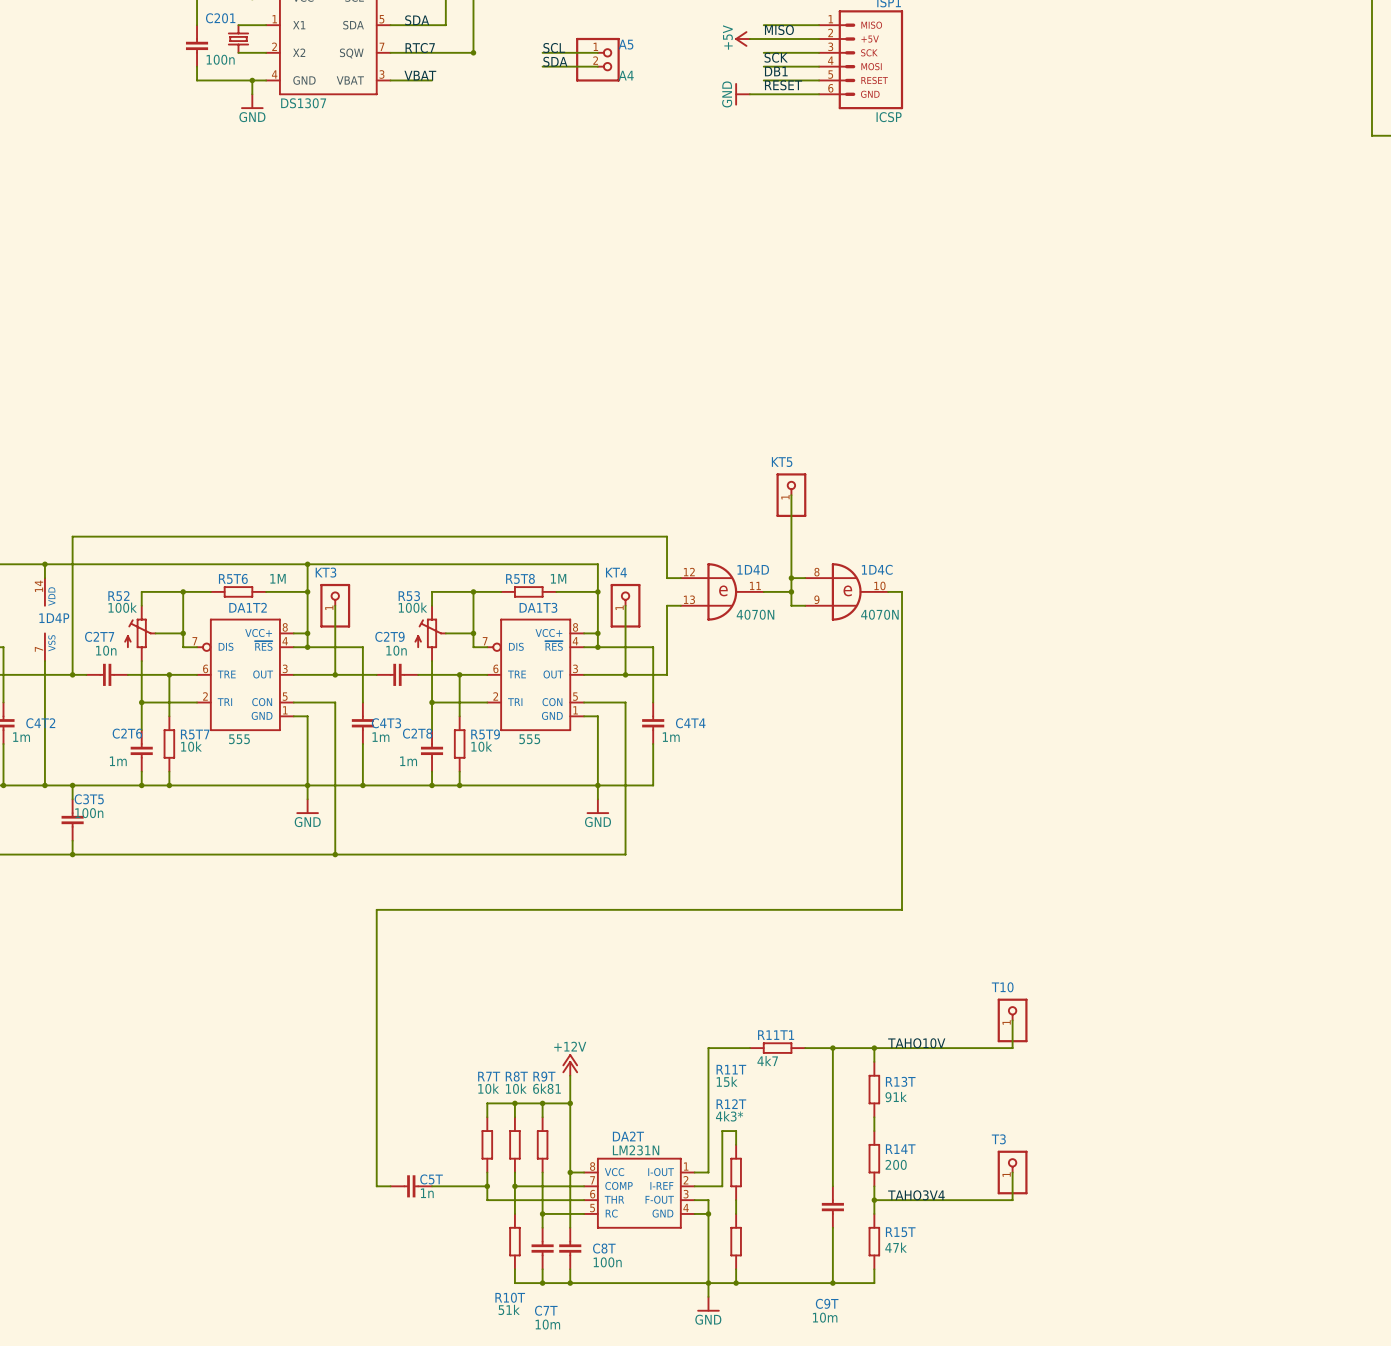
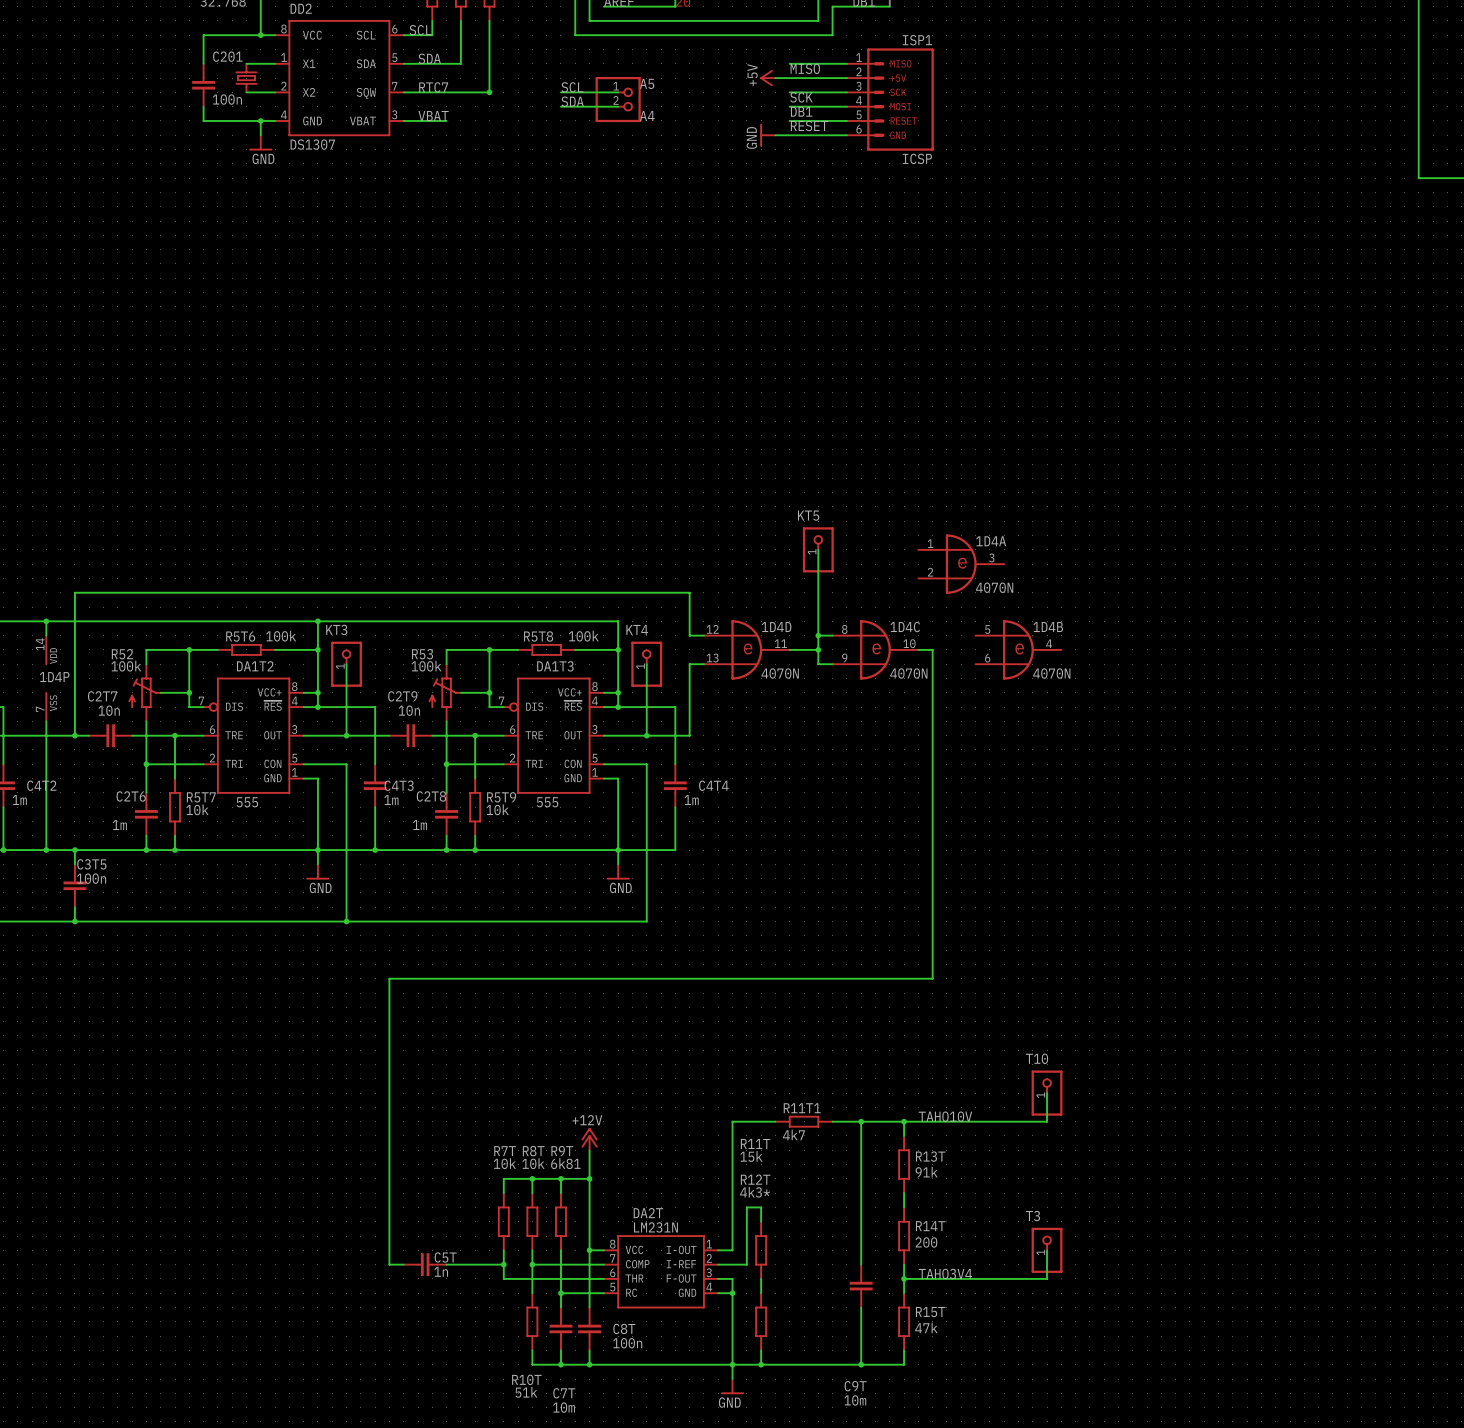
1D4A: none -> 4070N (961, 564)
R5T6 value: 1M (277, 578) -> 100k (281, 636)
R5T8 value: 1M (558, 578) -> 100k (583, 636)
1D4B: none -> 4070N (1018, 649)

